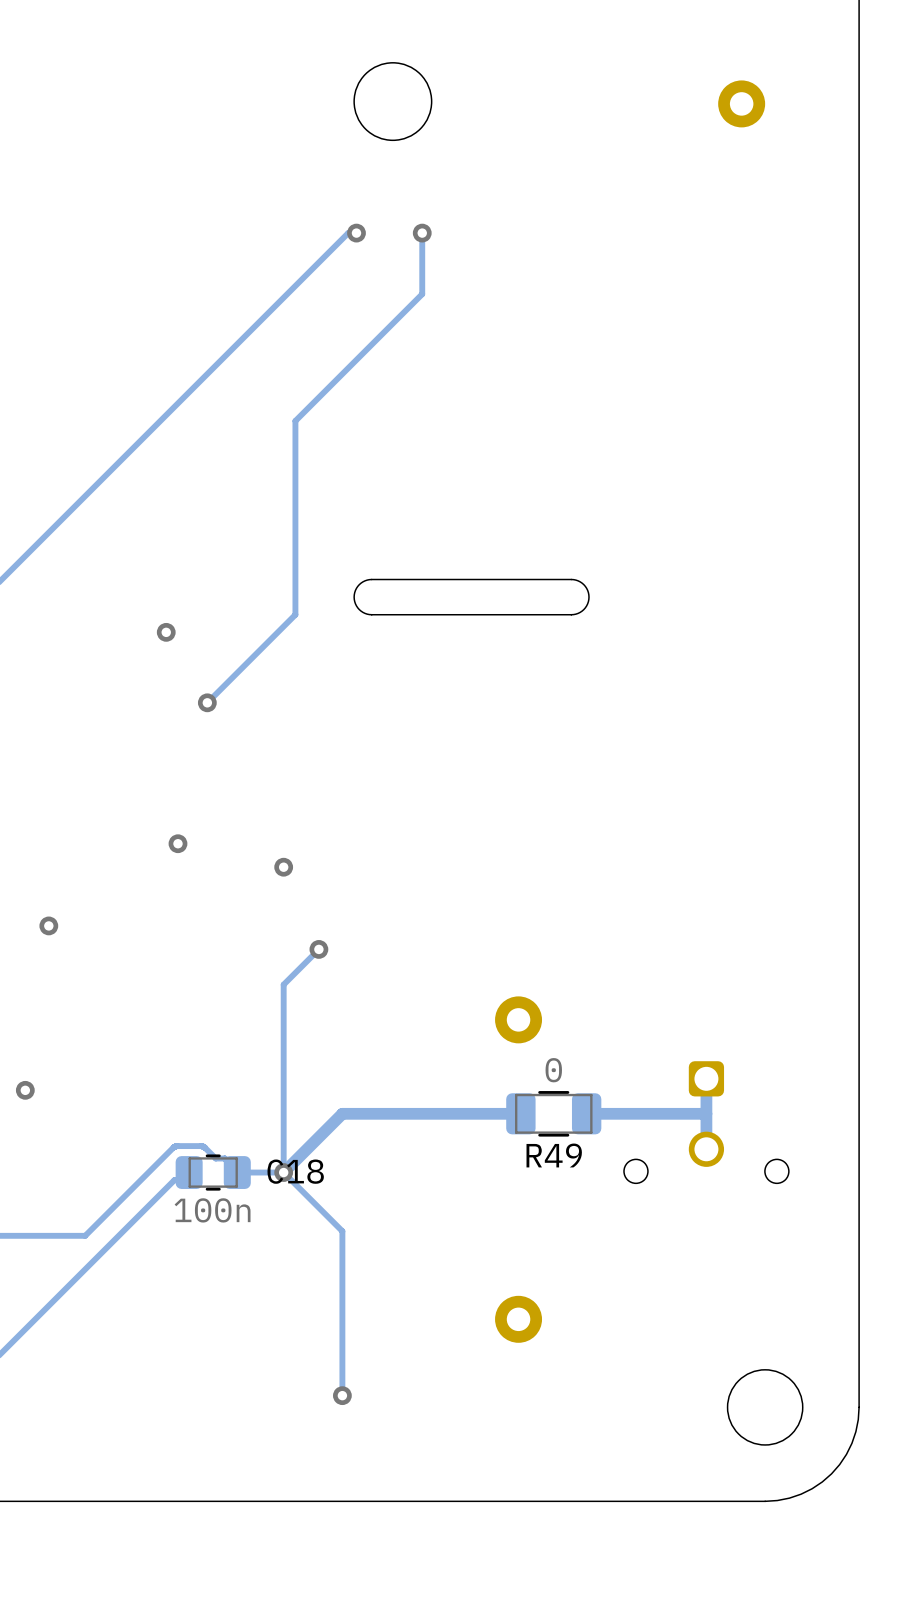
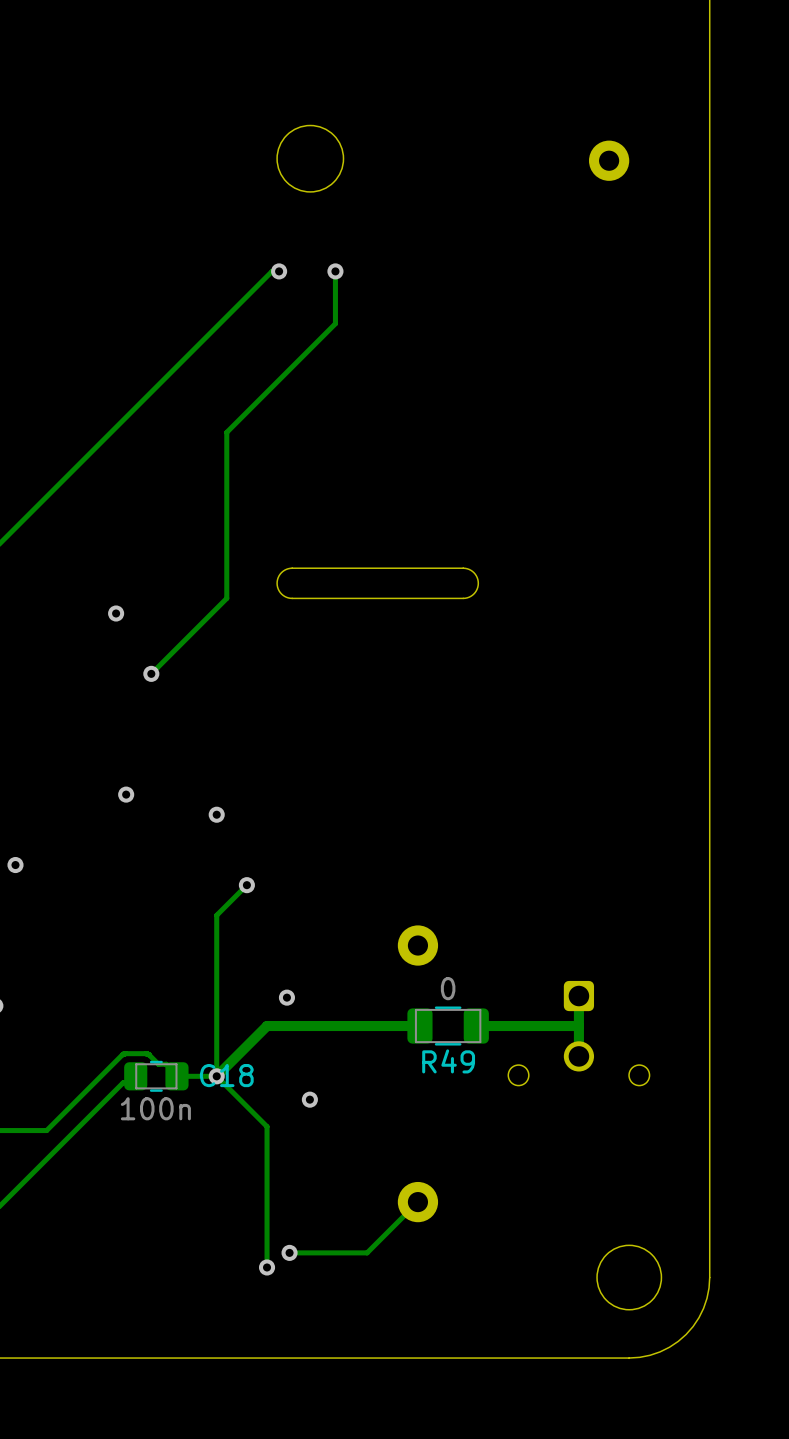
via: none -> (286, 997)
via: none -> (309, 1099)
track: none -> (417, 1202) (367, 1252) (289, 1252)
via: none -> (289, 1252)

